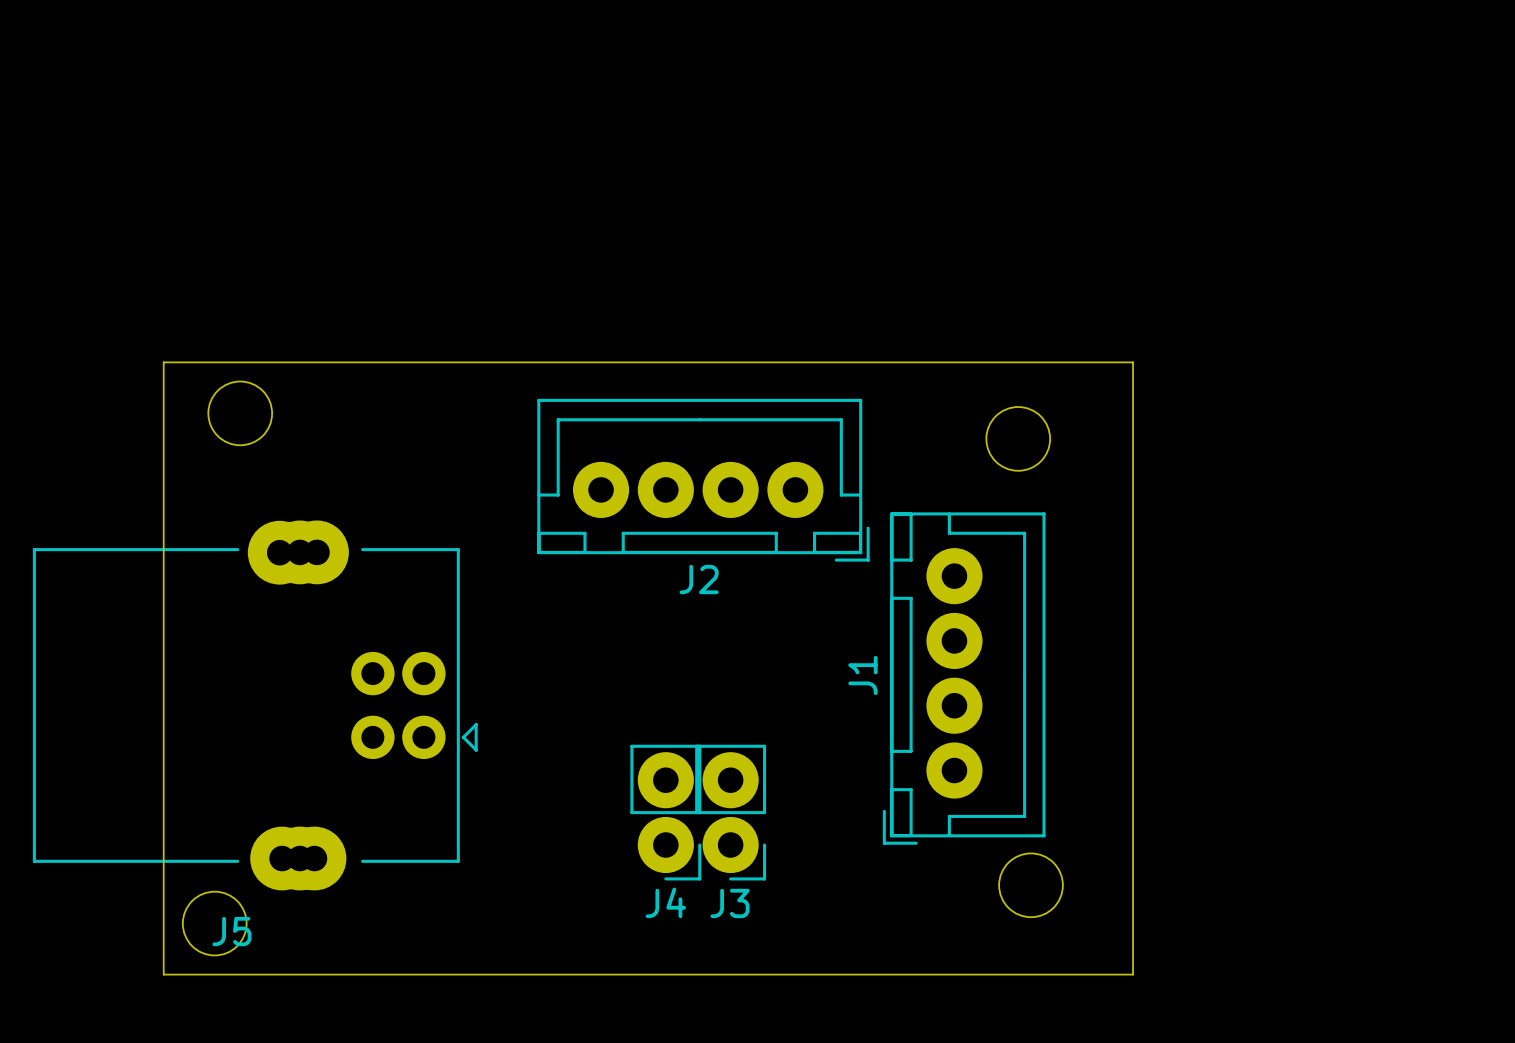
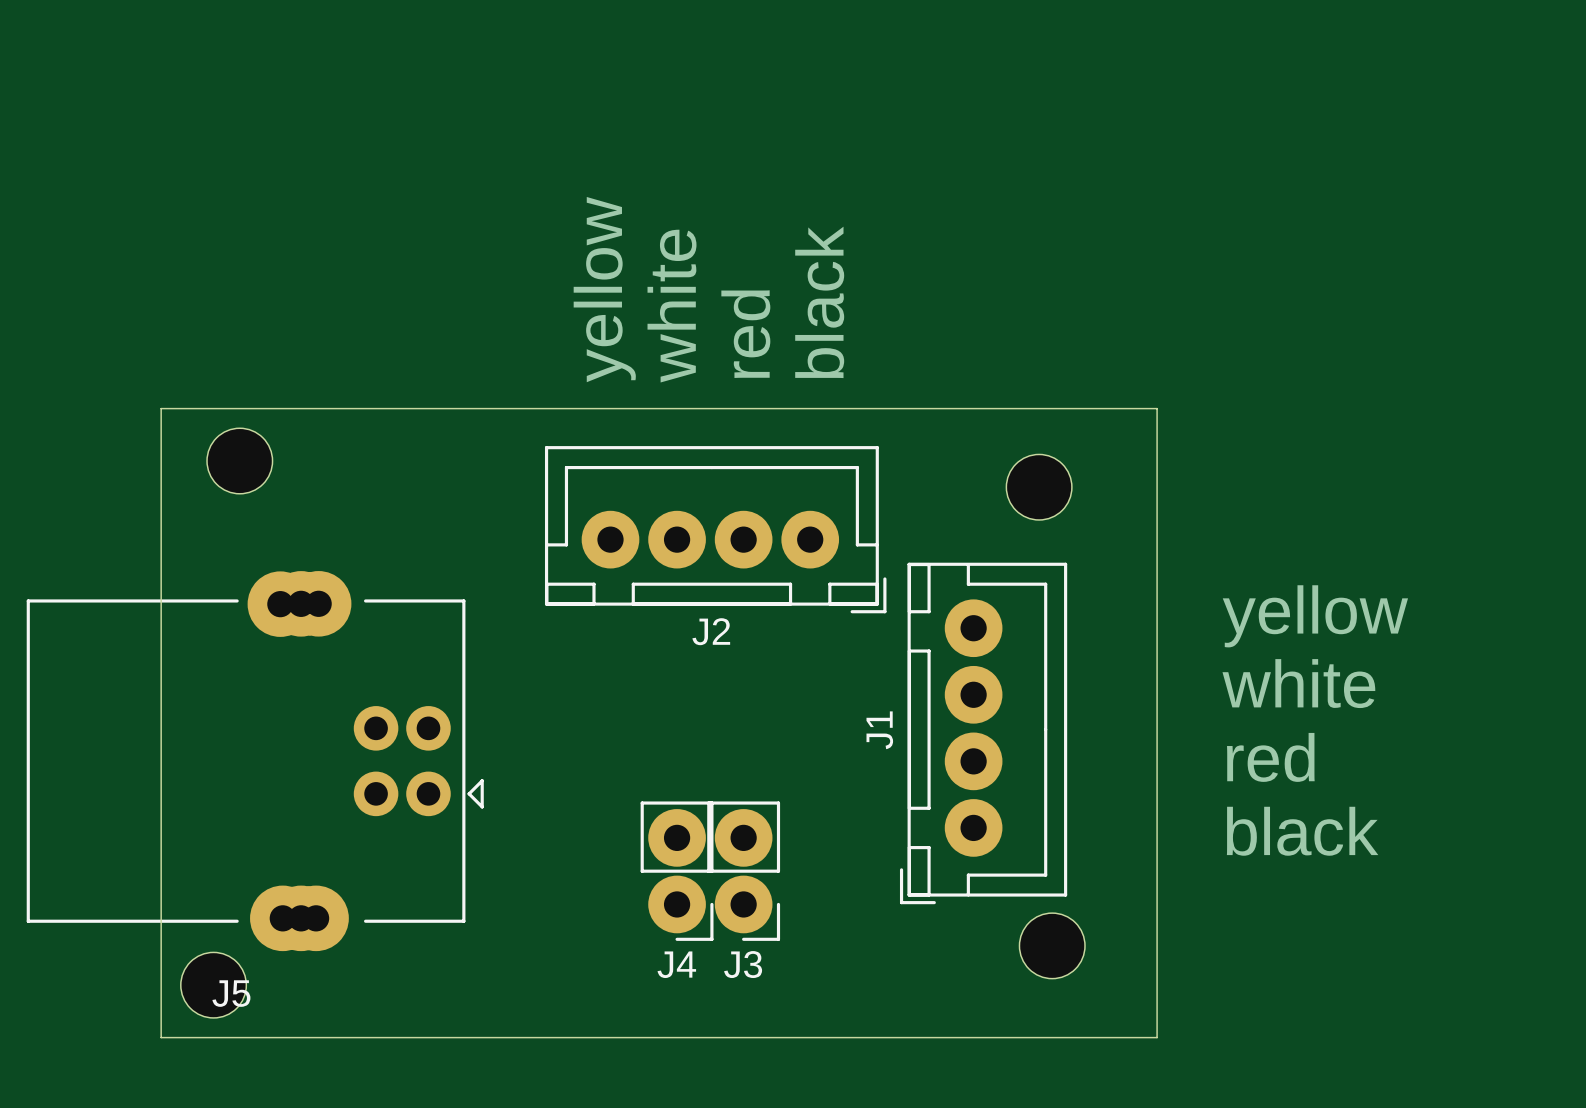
text: none -> yellow (604, 289)
text: none -> black (819, 302)
text: none -> white (672, 306)
text: none -> red (745, 334)
text: none -> yellow (1315, 616)
text: none -> white (1298, 683)
text: none -> red (1270, 757)
text: none -> black (1302, 831)

